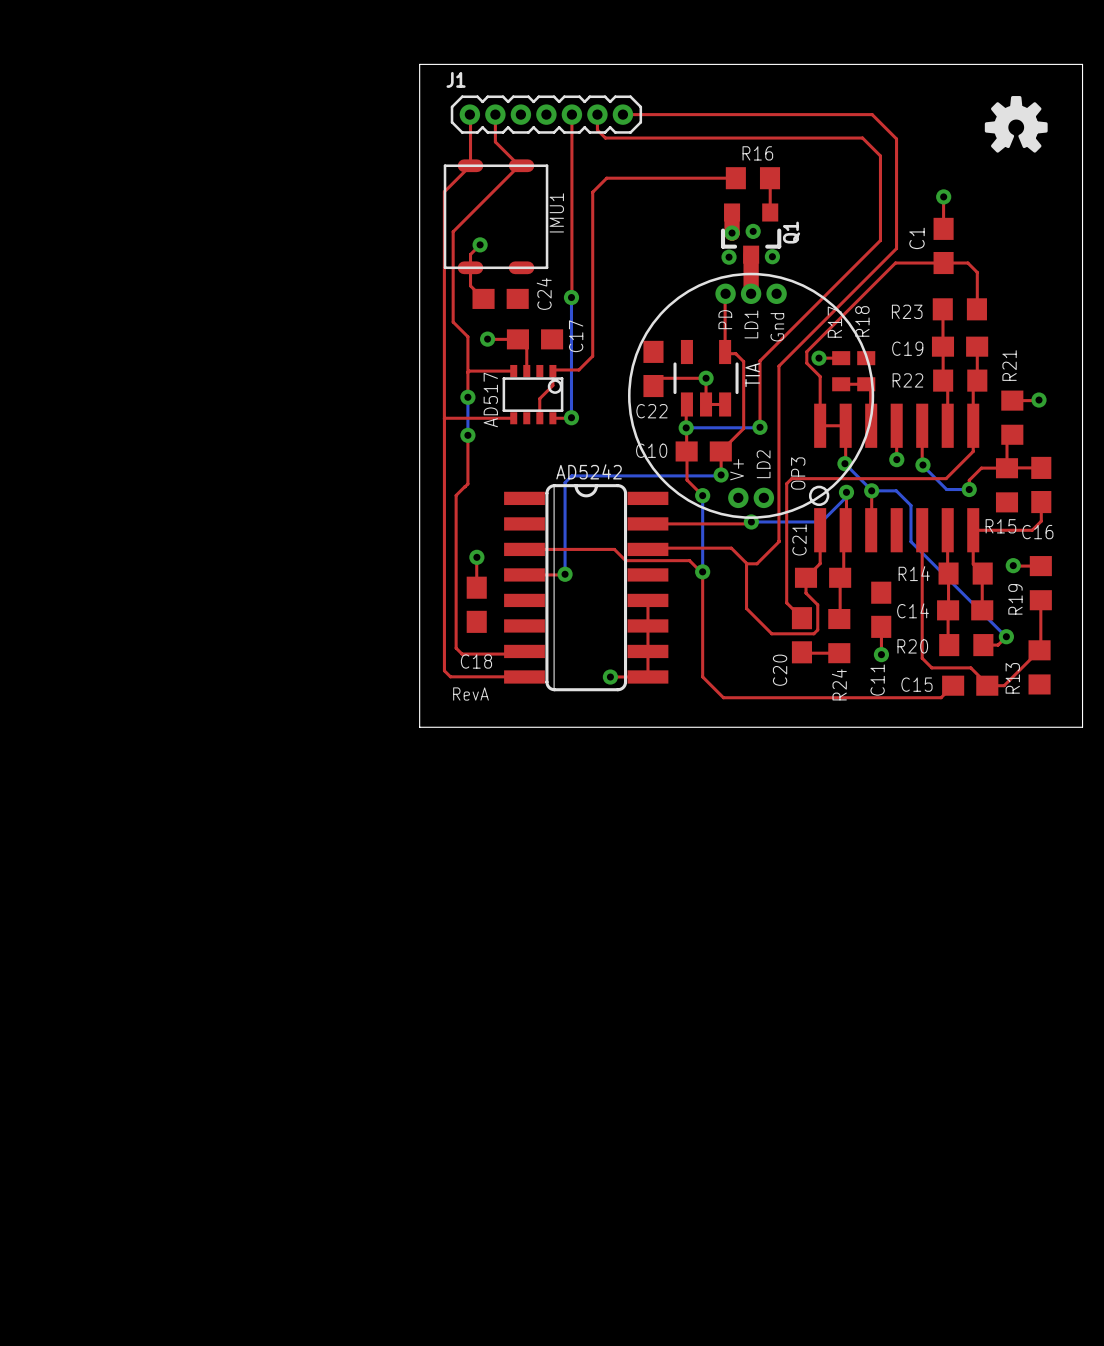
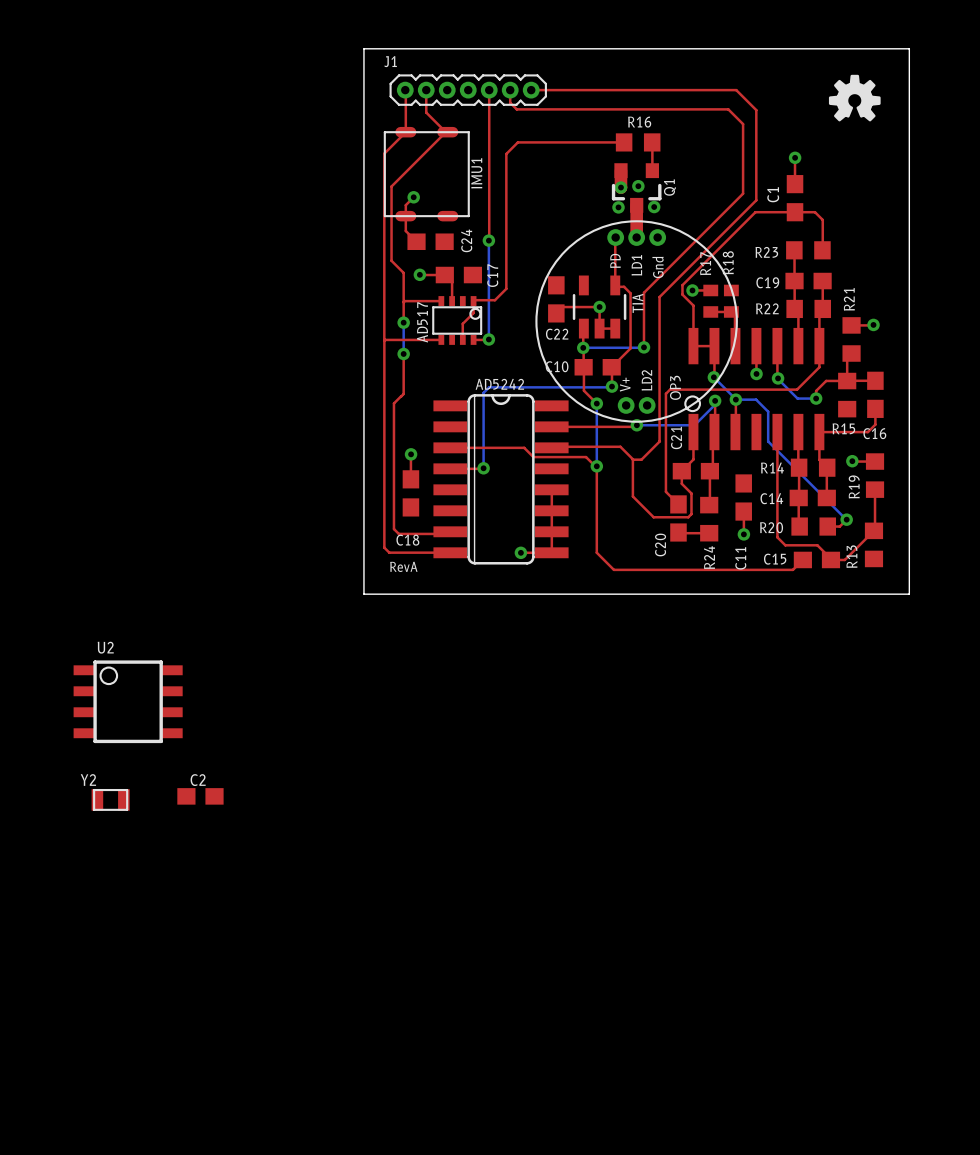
U2: none -> (128, 701)
C2: none -> (200, 796)
Y2: none -> (110, 799)

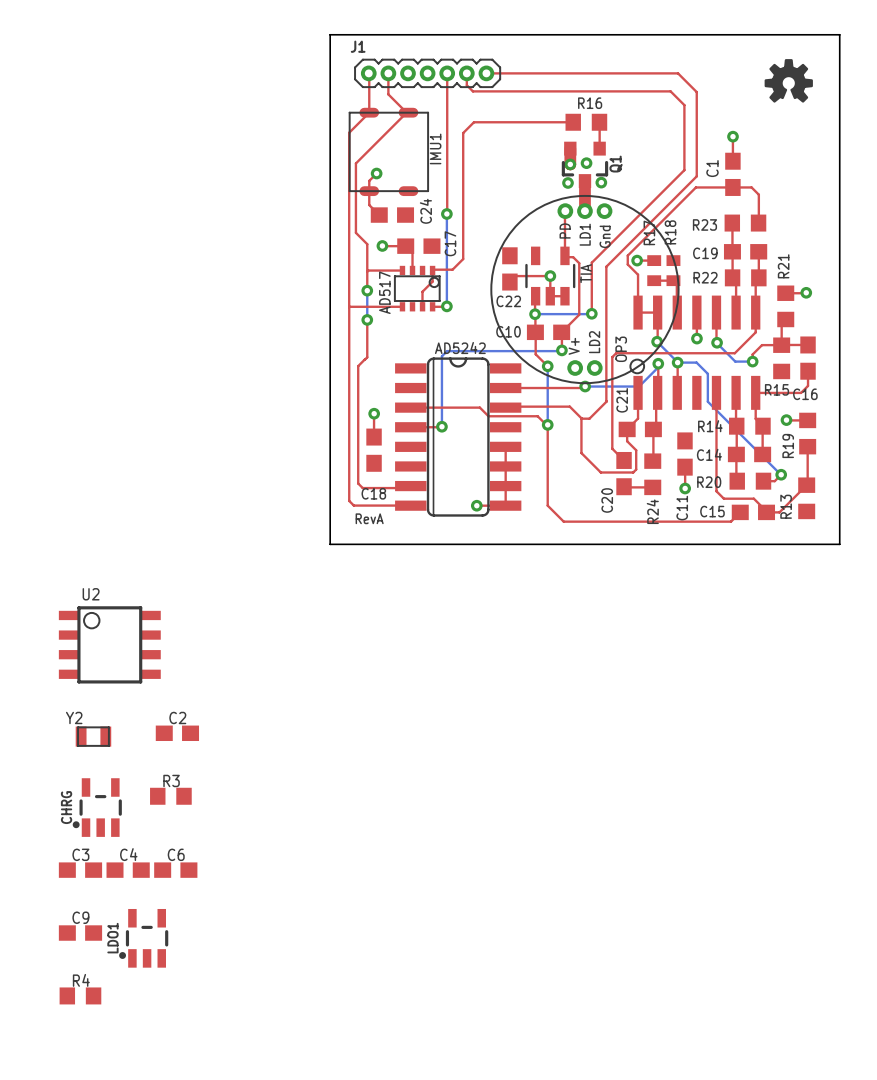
R3: none -> (170, 796)
CHRG: none -> (97, 807)
C3: none -> (80, 870)
C4: none -> (128, 870)
C6: none -> (175, 870)
C9: none -> (80, 933)
LDO1: none -> (143, 938)
R4: none -> (80, 995)

